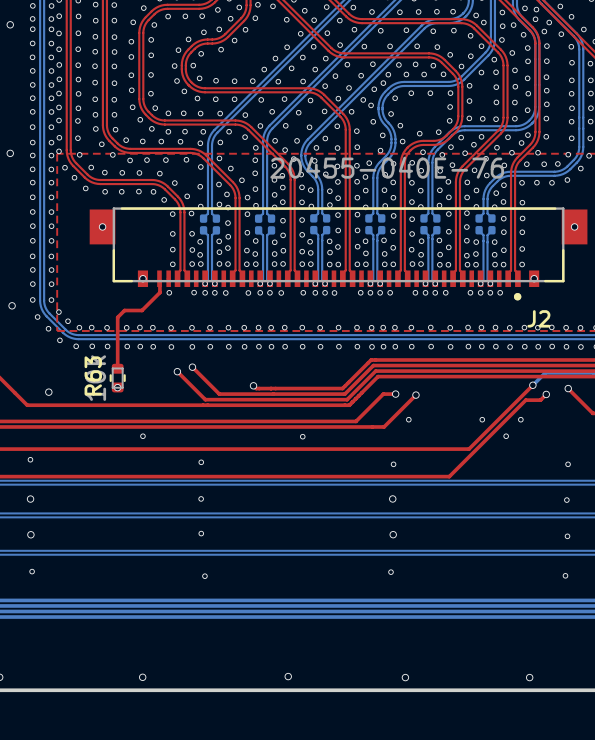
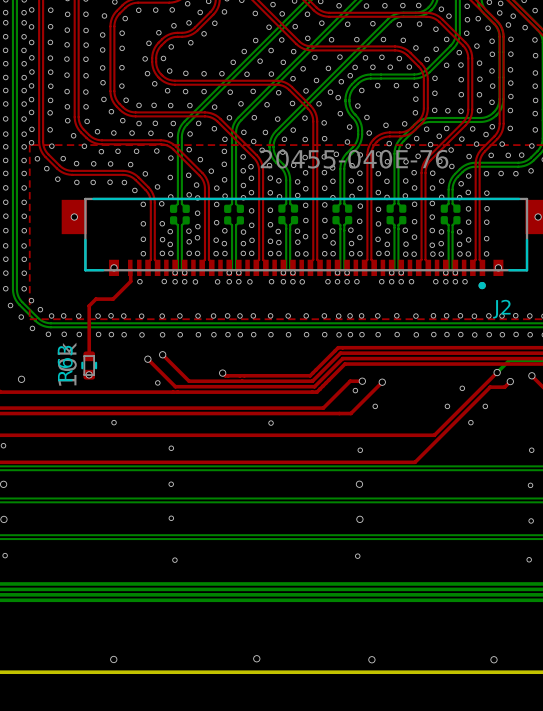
via: none -> (157, 382)
via: none -> (462, 388)
via: none -> (355, 390)

